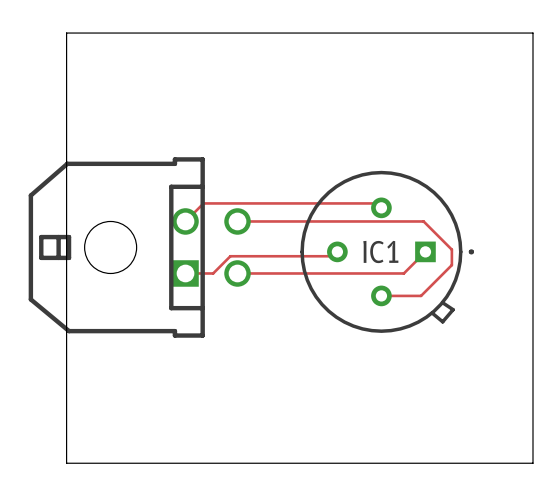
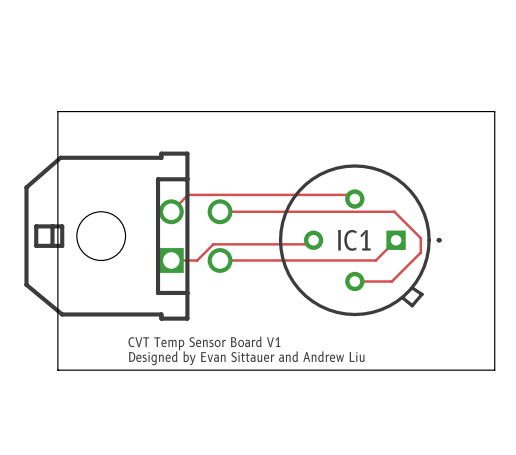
board edge: (66, 33) (532, 33) (532, 463) (66, 463) (66, 33) -> (57, 111) (57, 370) (494, 370) (494, 111) (57, 111)
text: none -> CVT Temp Sensor Board V1 (204, 343)
text: none -> Designed by Evan Sittauer and Andrew Liu (246, 358)

